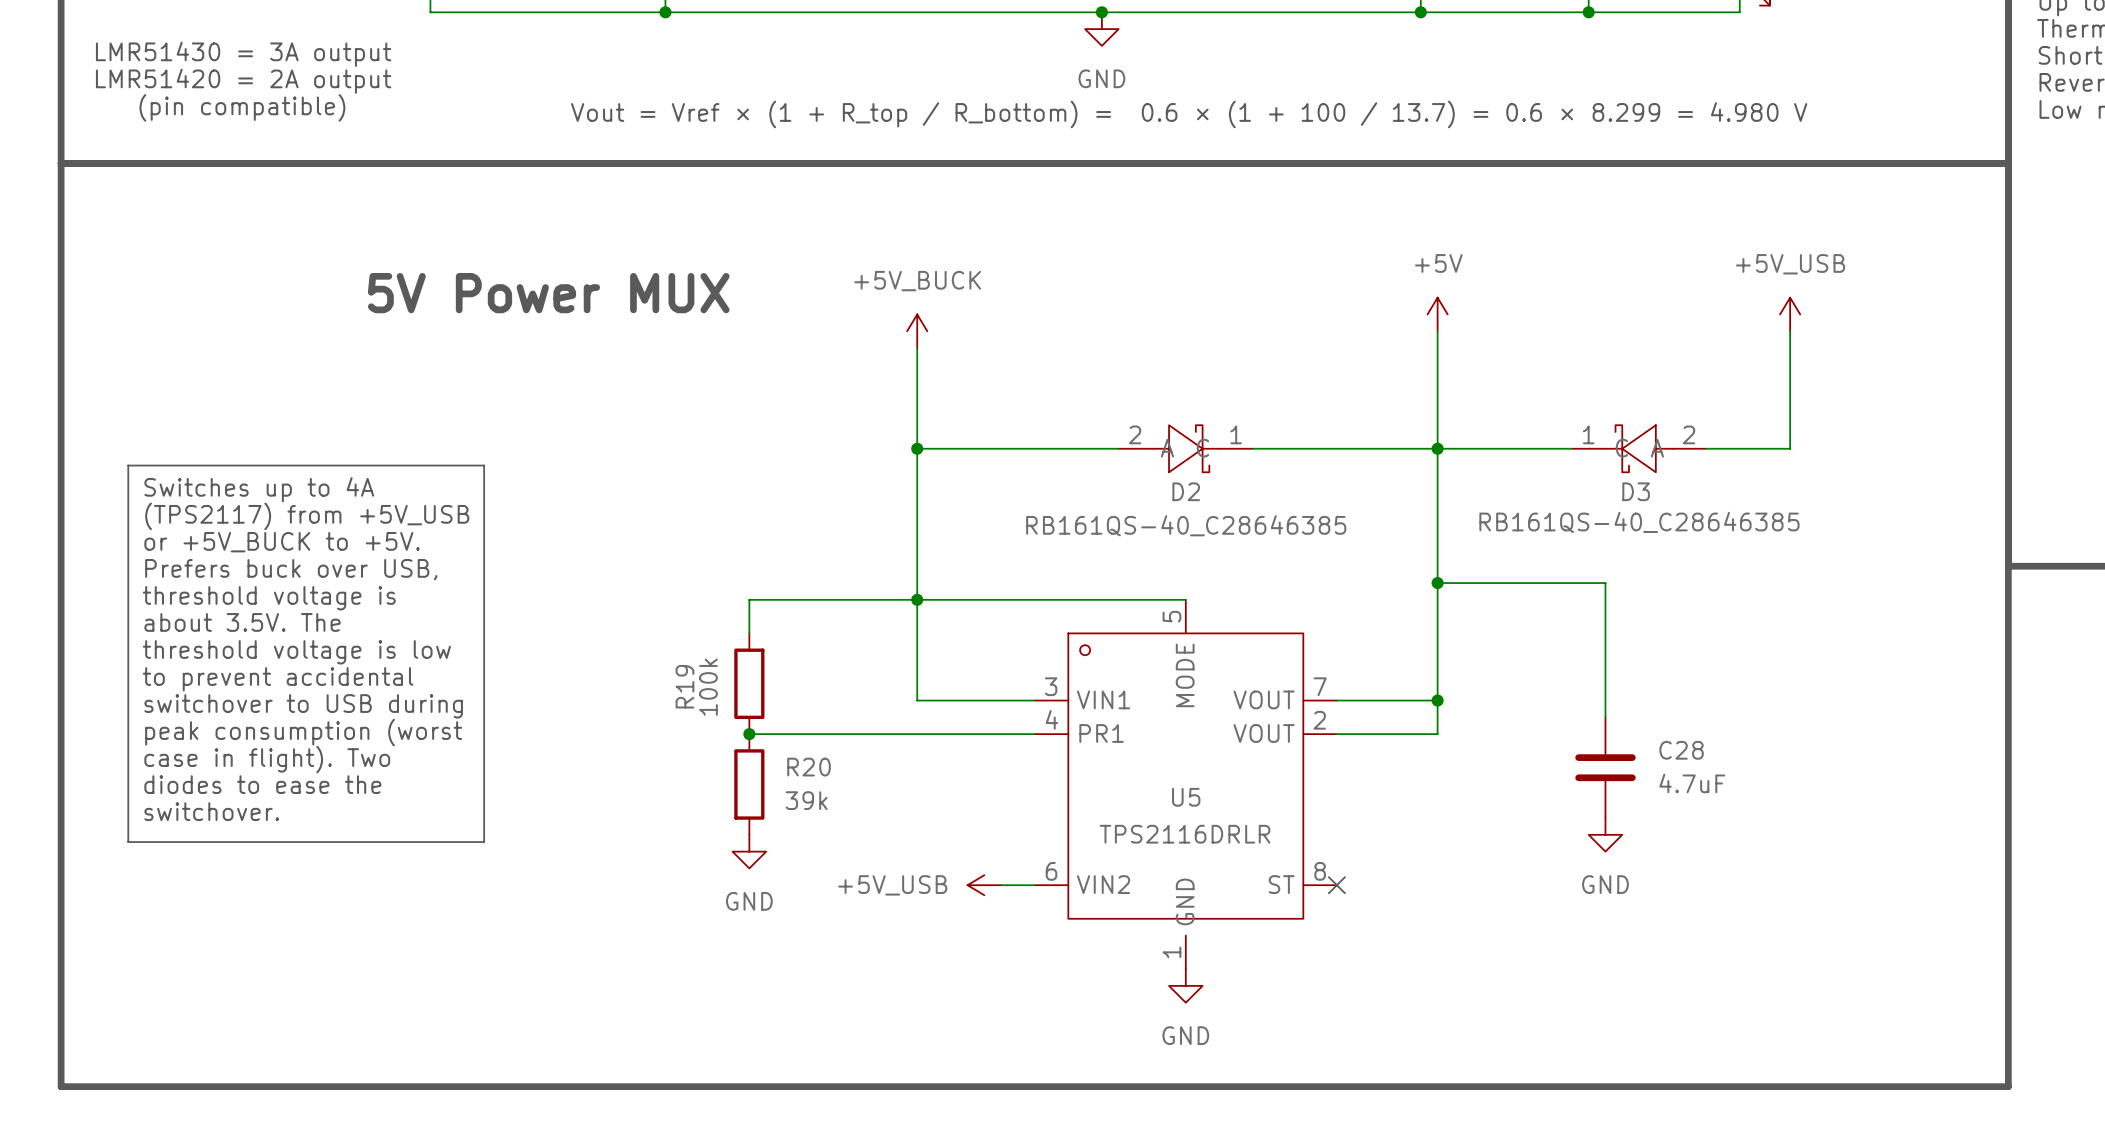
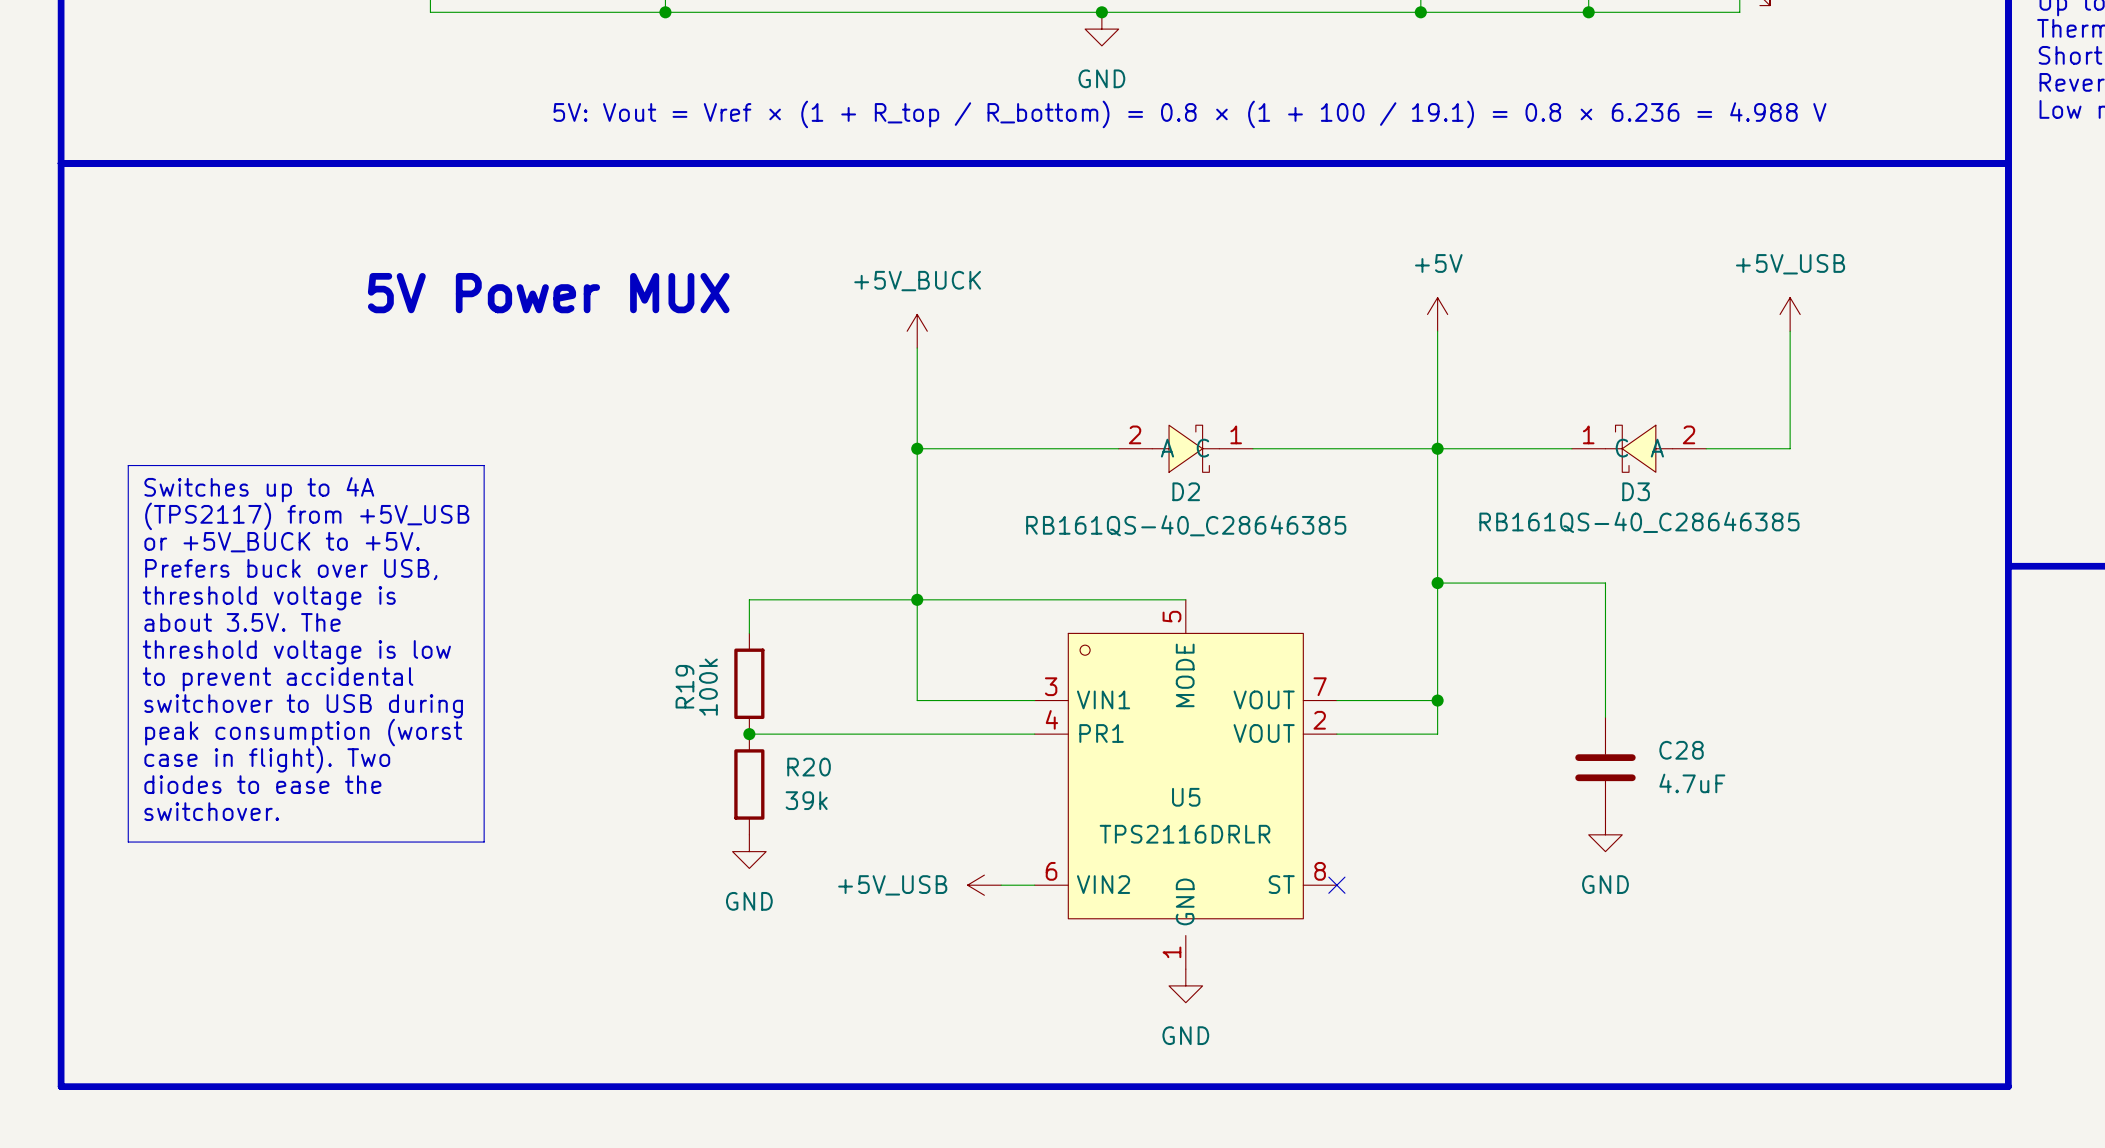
text: LMR51430 = 3A output (243, 54) -> none
text: LMR51420 = 2A output (243, 81) -> none
text: (pin compatible) (242, 107) -> none
text: Vout = Vref × (1 + R_top / R_bottom) = 0.6 × (1 + 100 / 13.7) = 0.6 × 8.299 = 4.980 V (1189, 114) -> 5V: Vout = Vref × (1 + R_top / R_bottom) = 0.8 × (1 + 100 / 19.1) = 0.8 × 6.236 = 4.988 V (1189, 114)

